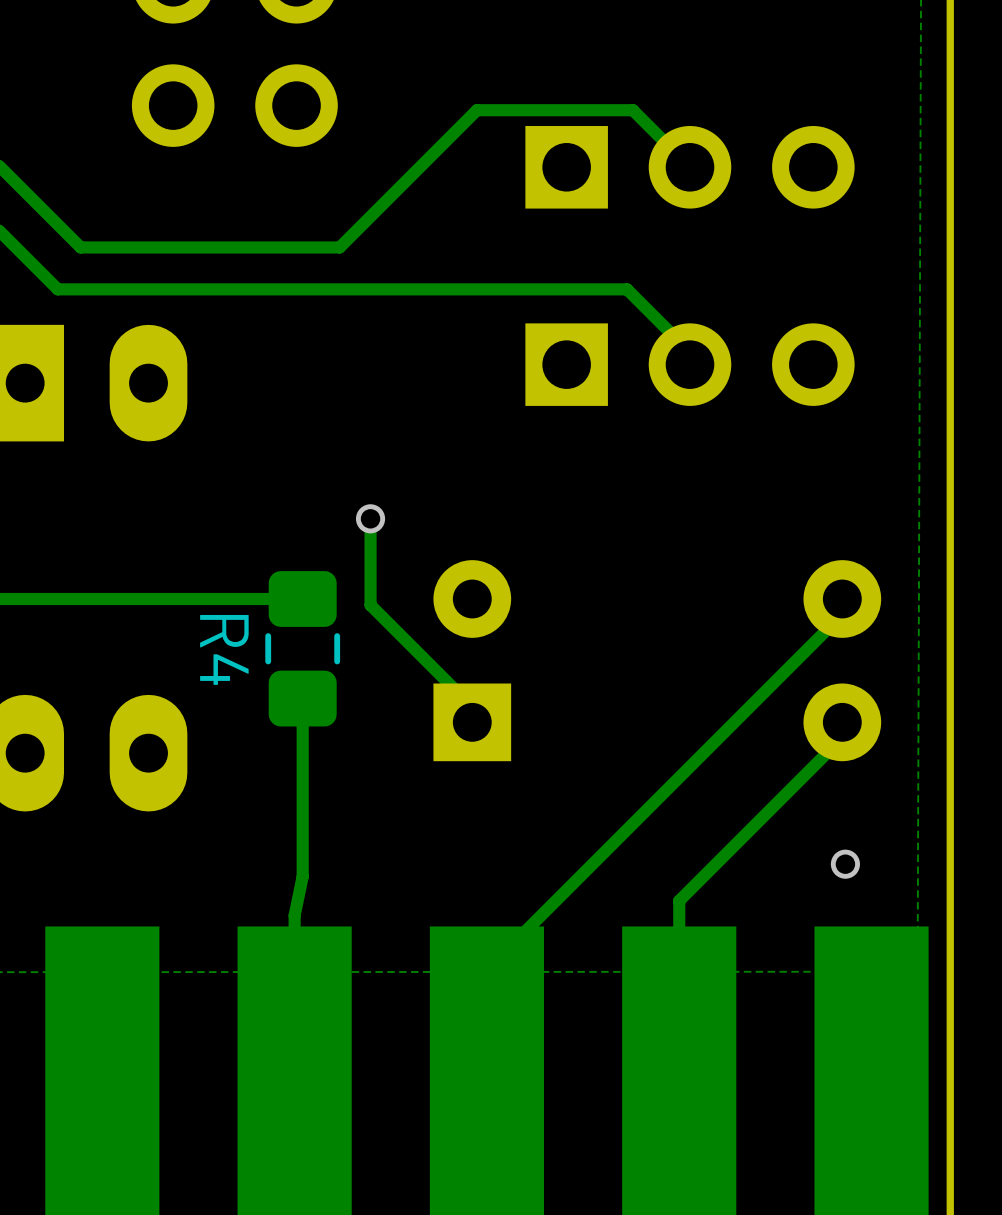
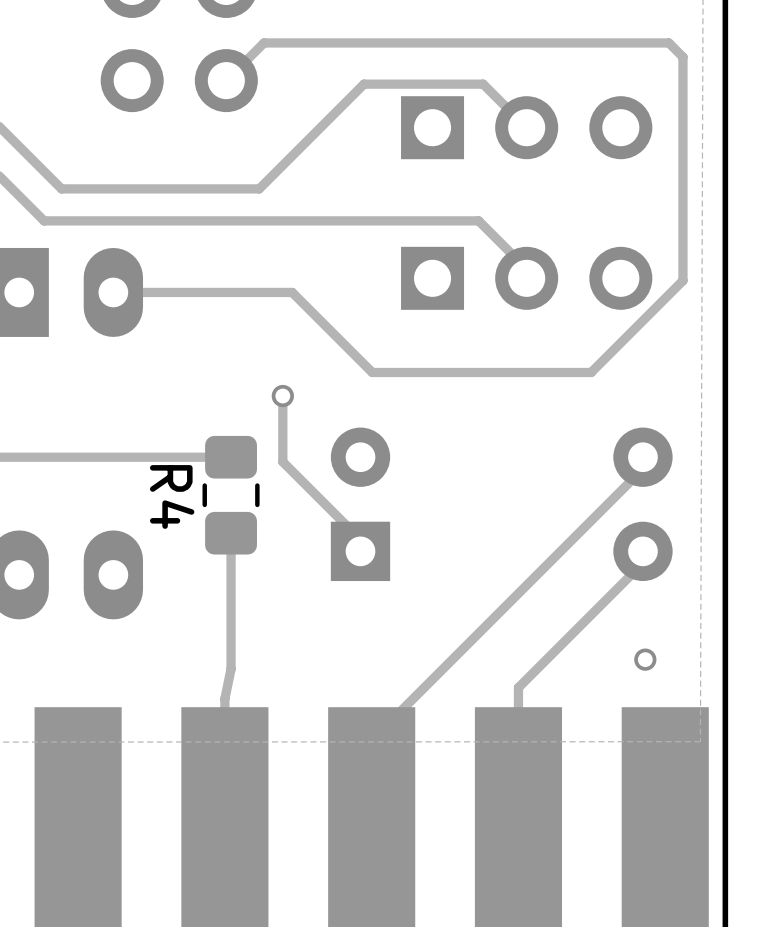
track: none -> (226, 80) (264, 42) (668, 42) (682, 57) (682, 280) (591, 372) (372, 372) (292, 292) (113, 292)

